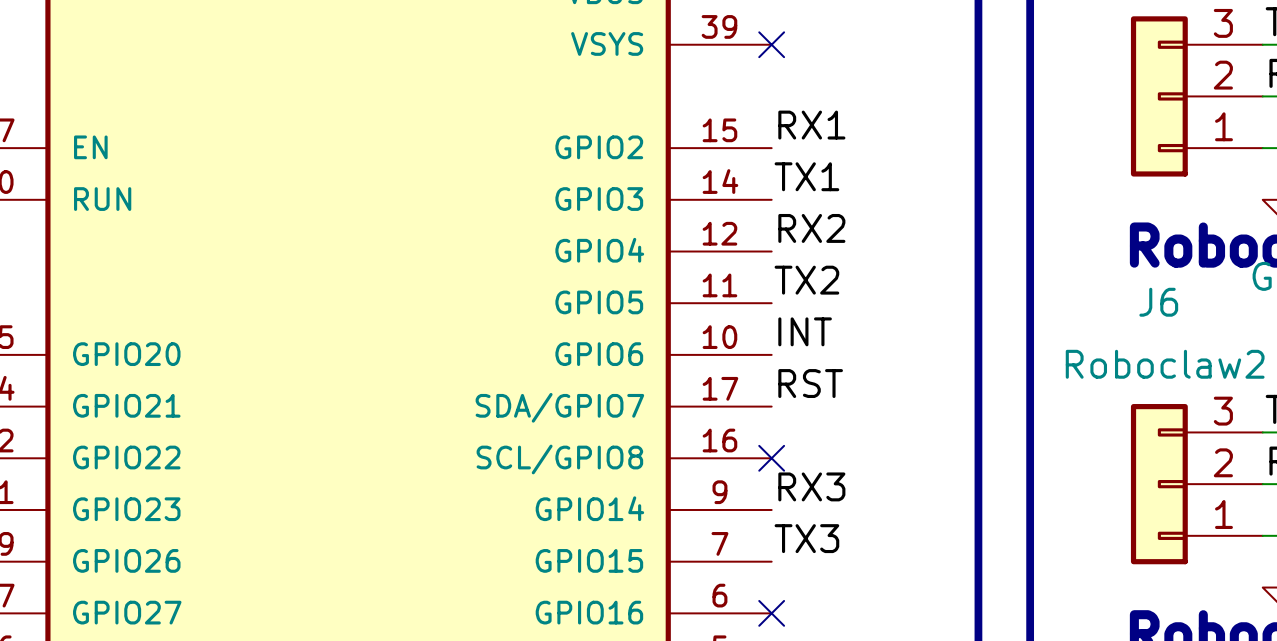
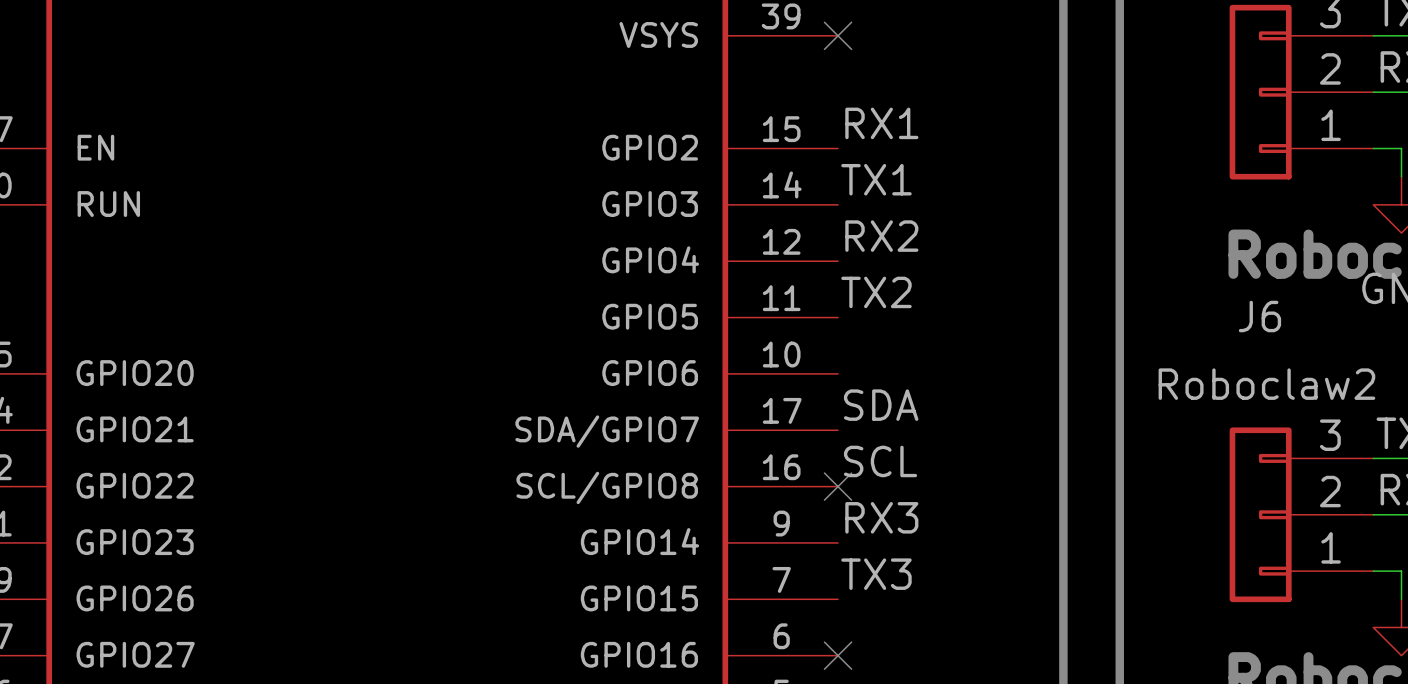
label: INT (805, 331) -> none
label: RST (810, 383) -> SDA (881, 405)
label: none -> SCL (880, 461)

